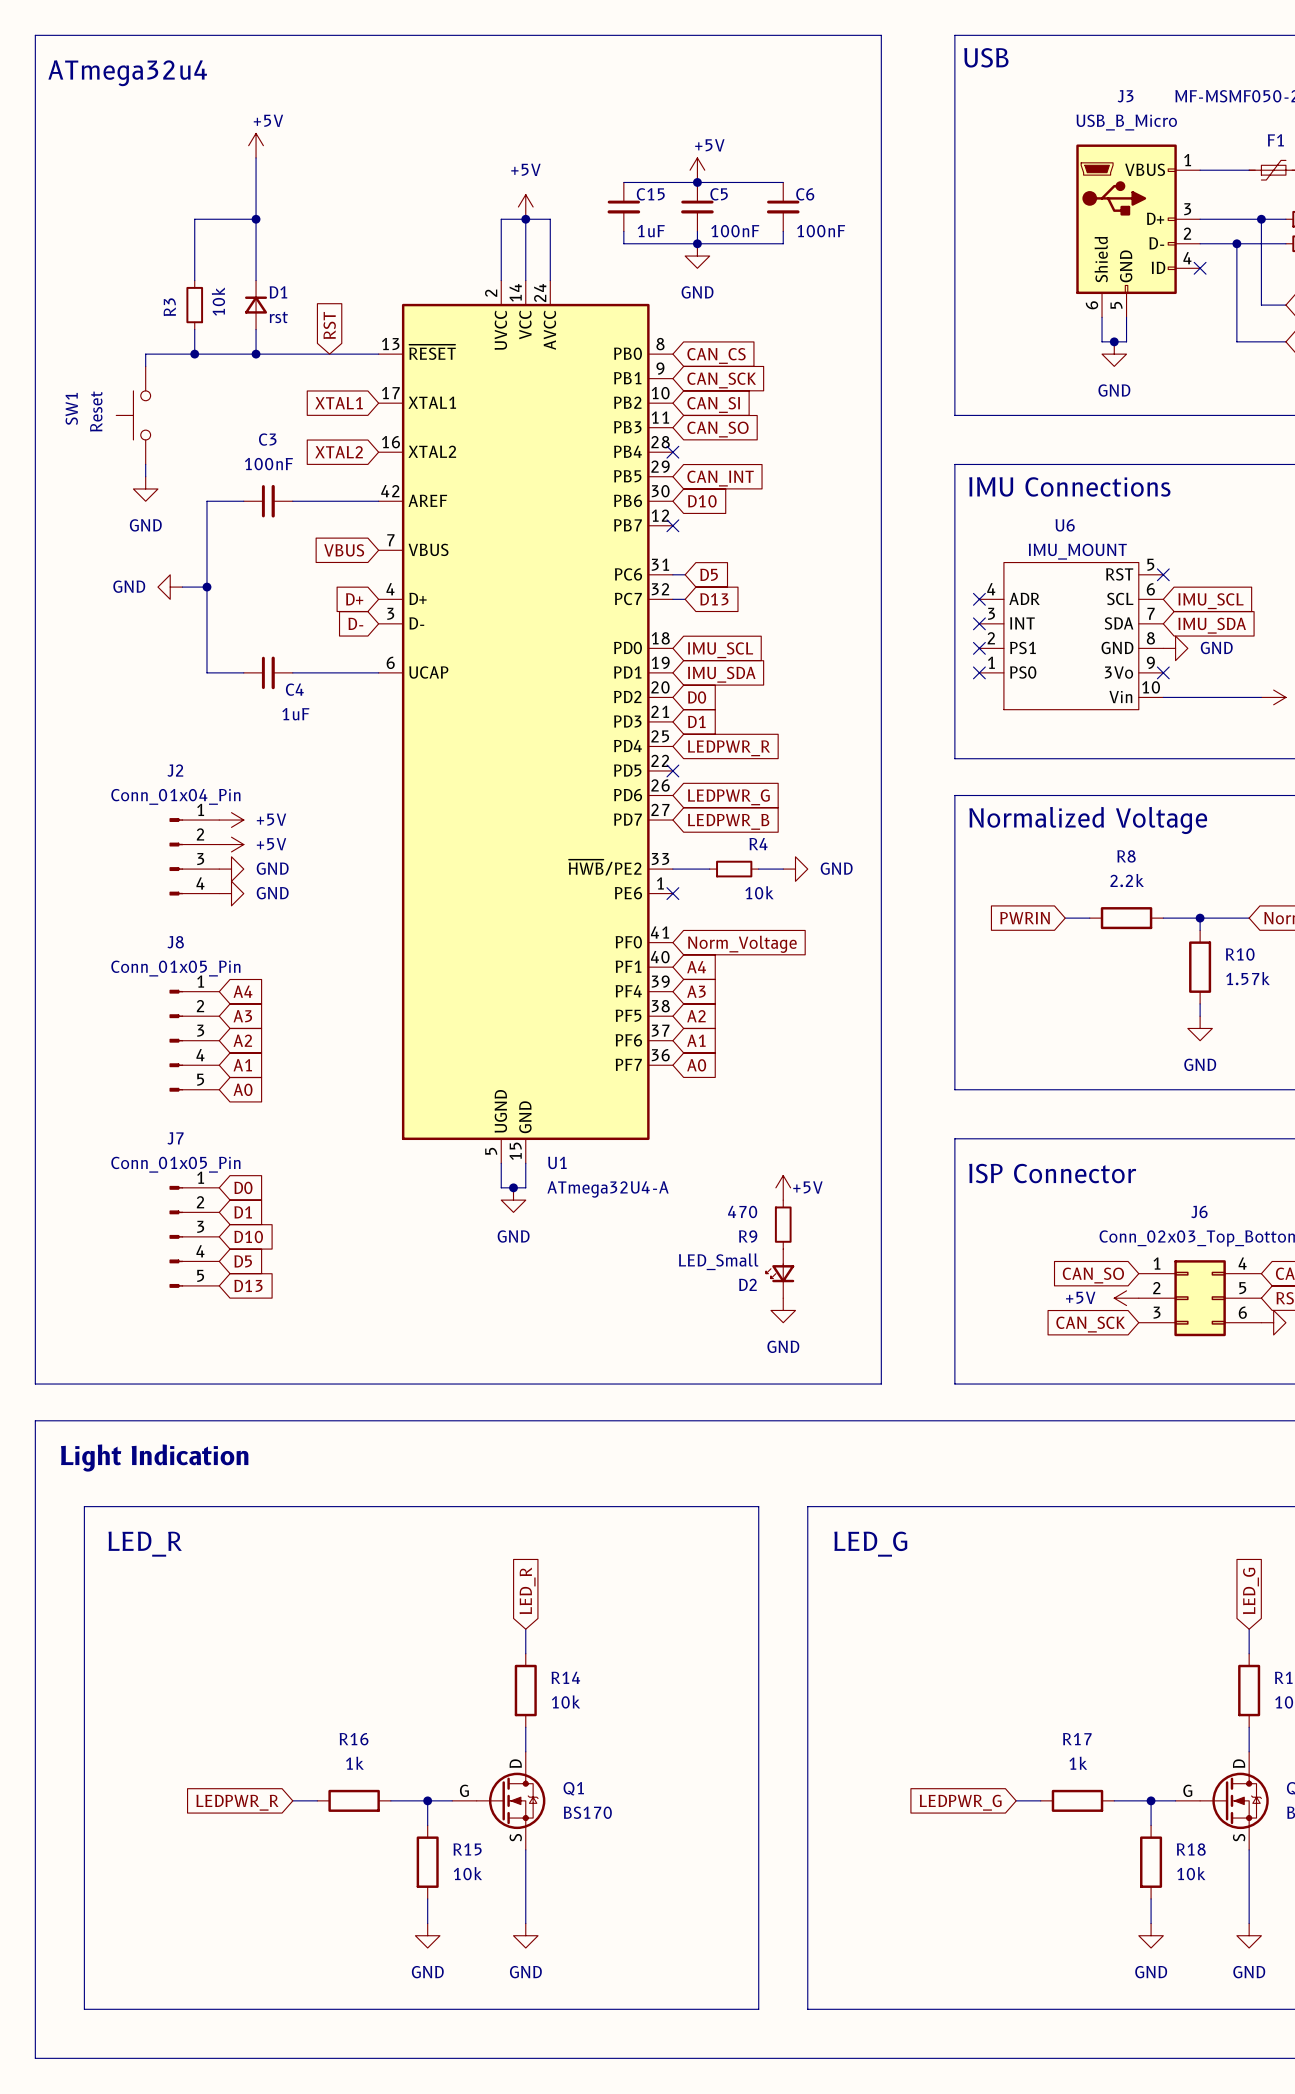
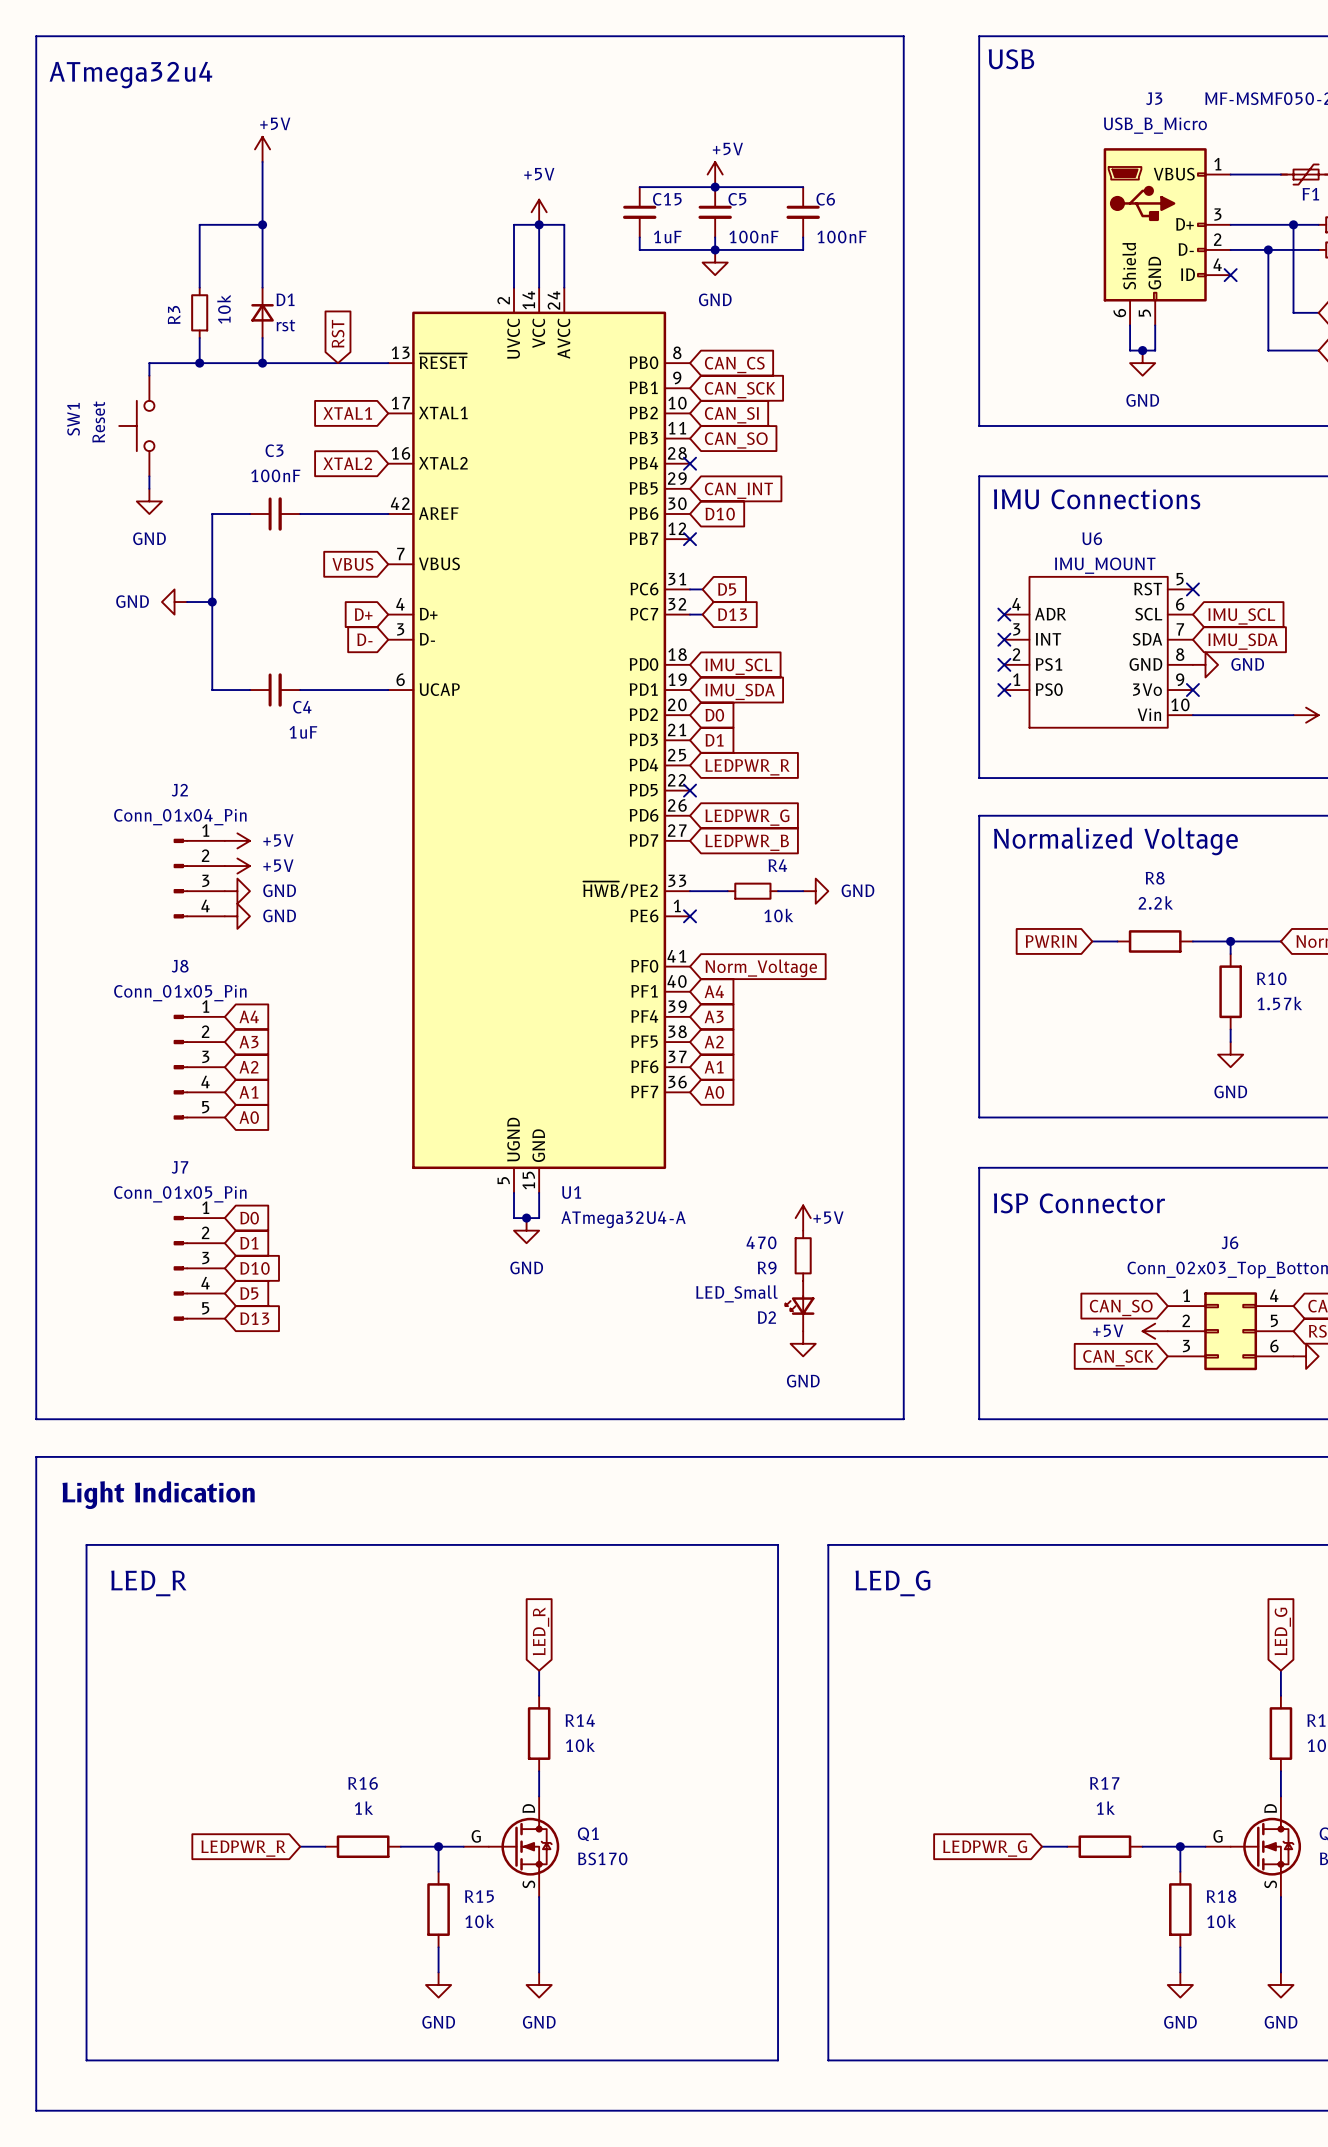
F1 name position: F1 (1275, 140) -> F1 (1310, 194)

